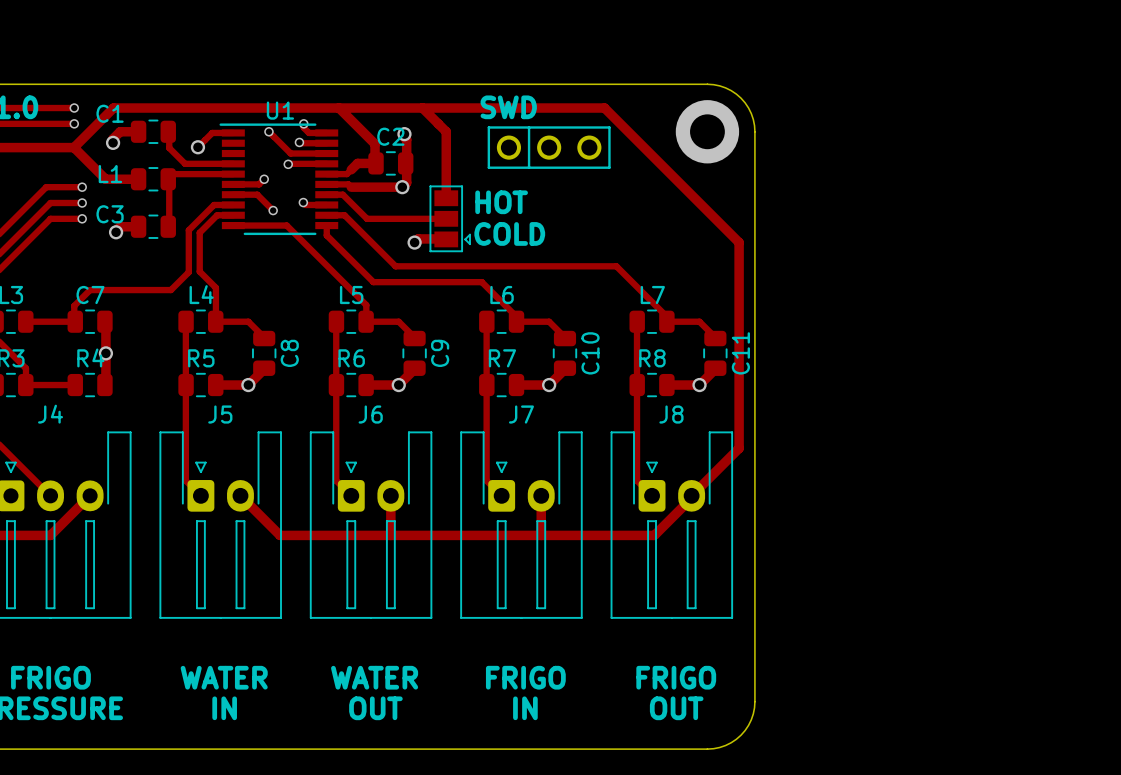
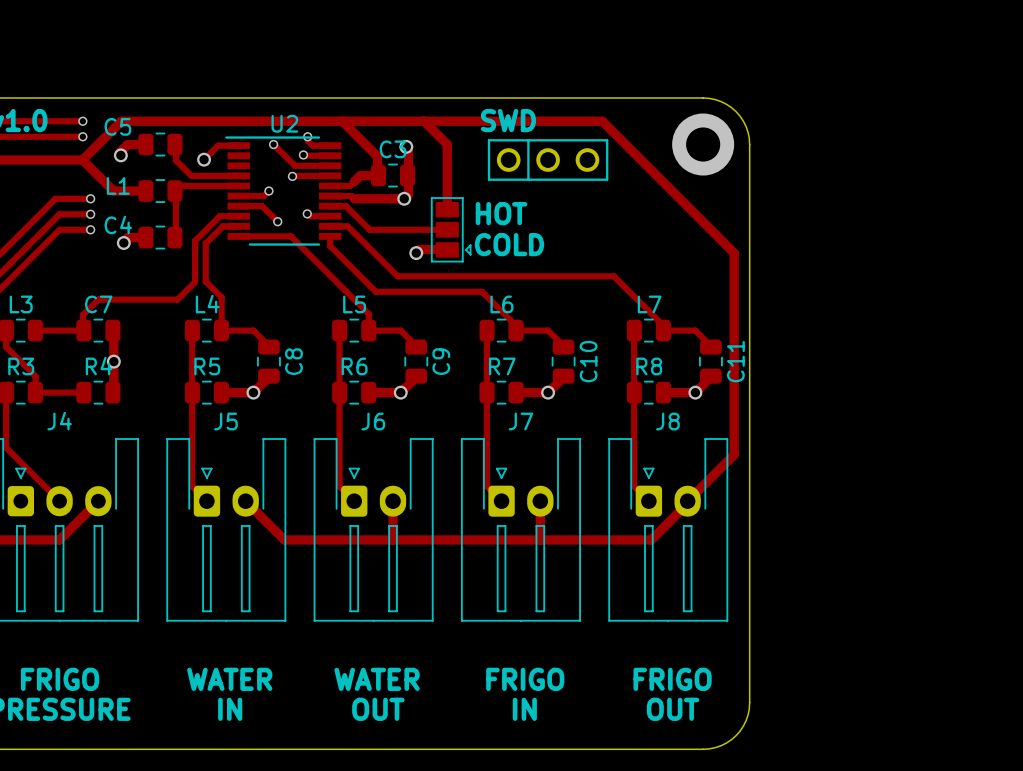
U1 name: U1 (280, 110) -> U2 (284, 123)
C1 name: C1 (110, 113) -> C5 (117, 126)
C2 name: C2 (390, 136) -> C3 (393, 149)
C3 name: C3 (110, 214) -> C4 (118, 224)

